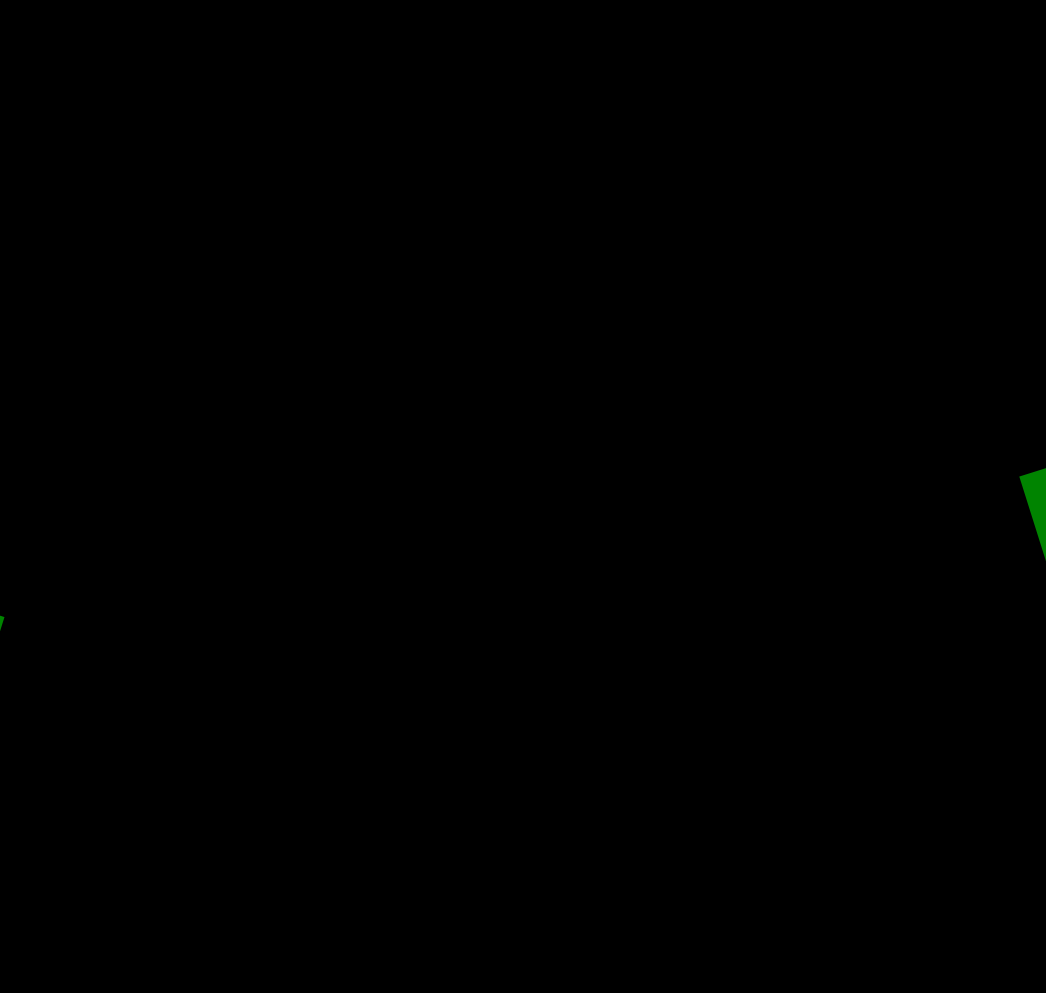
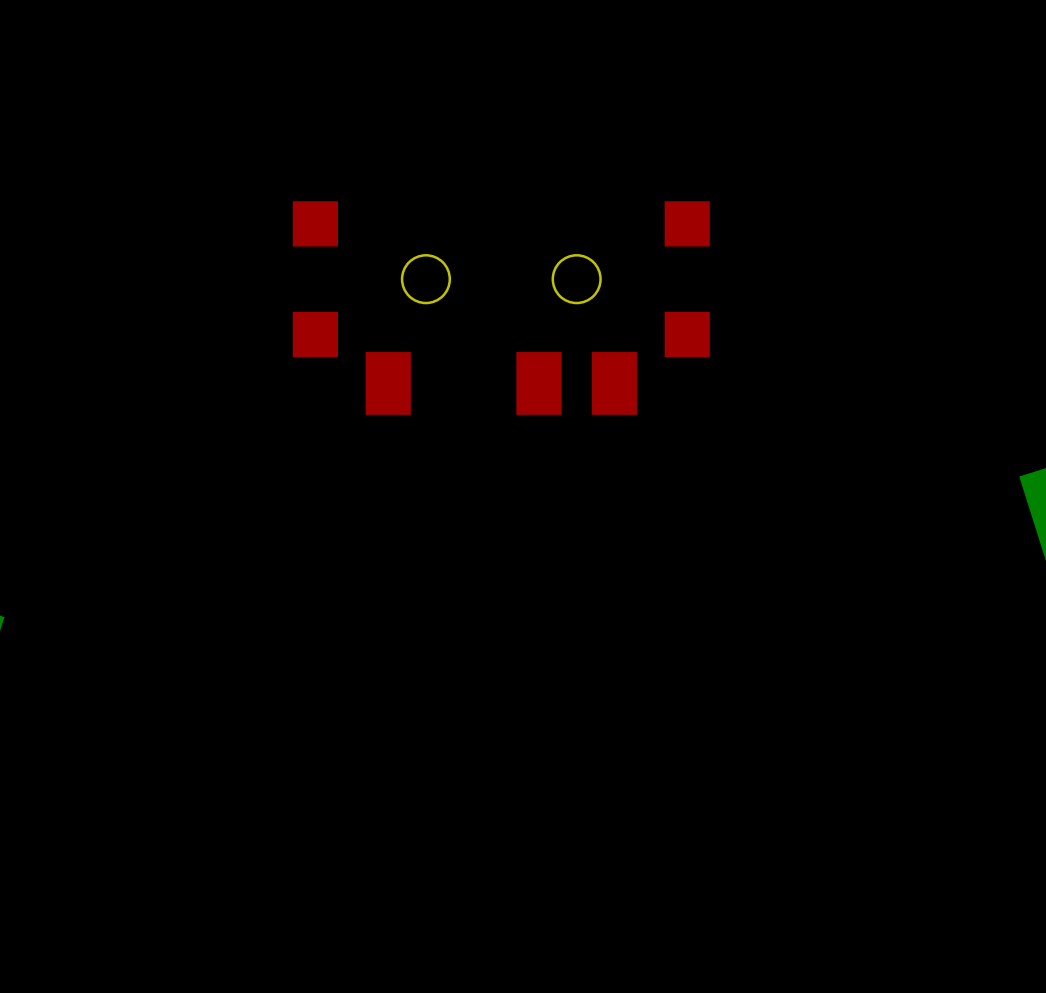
part: none -> (501, 308)

